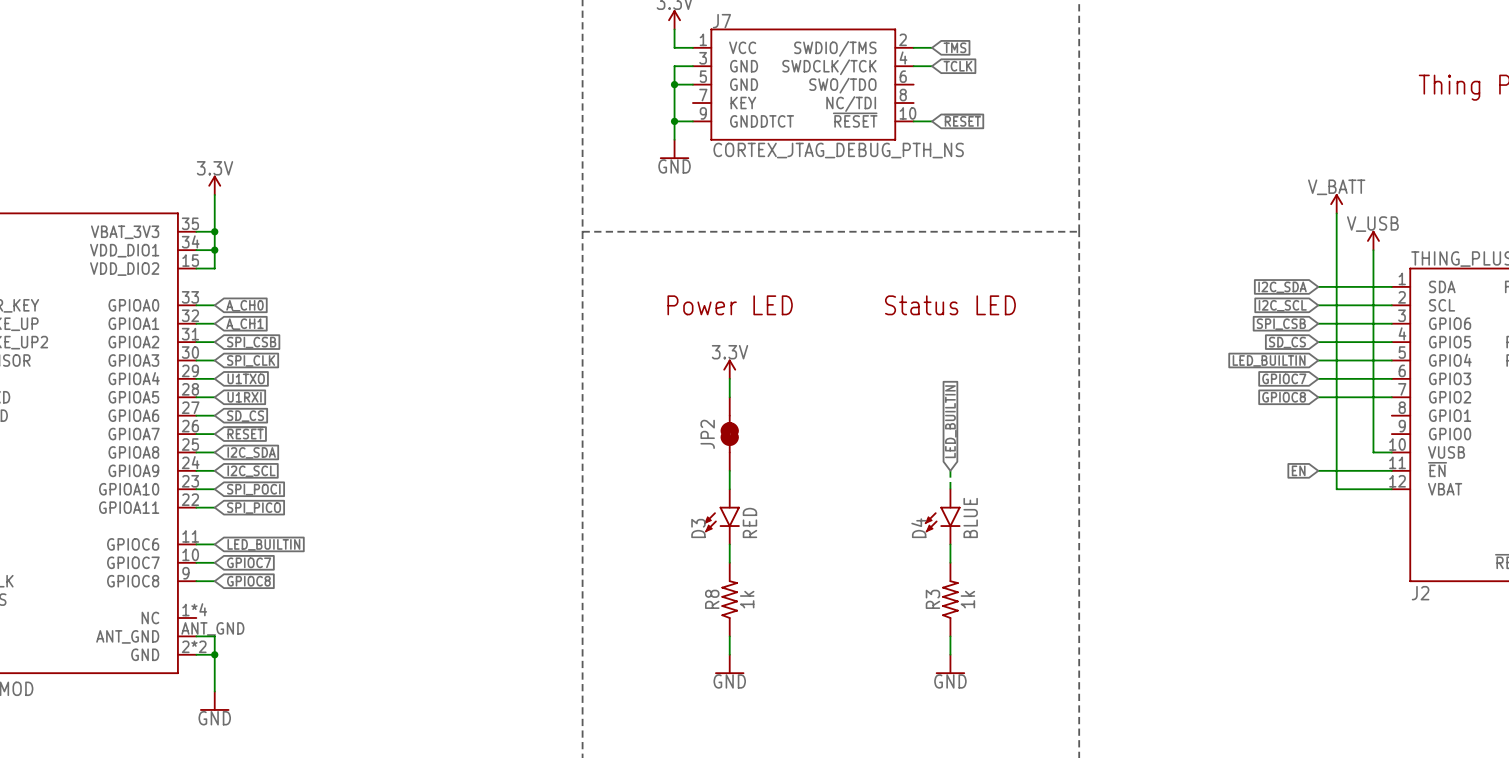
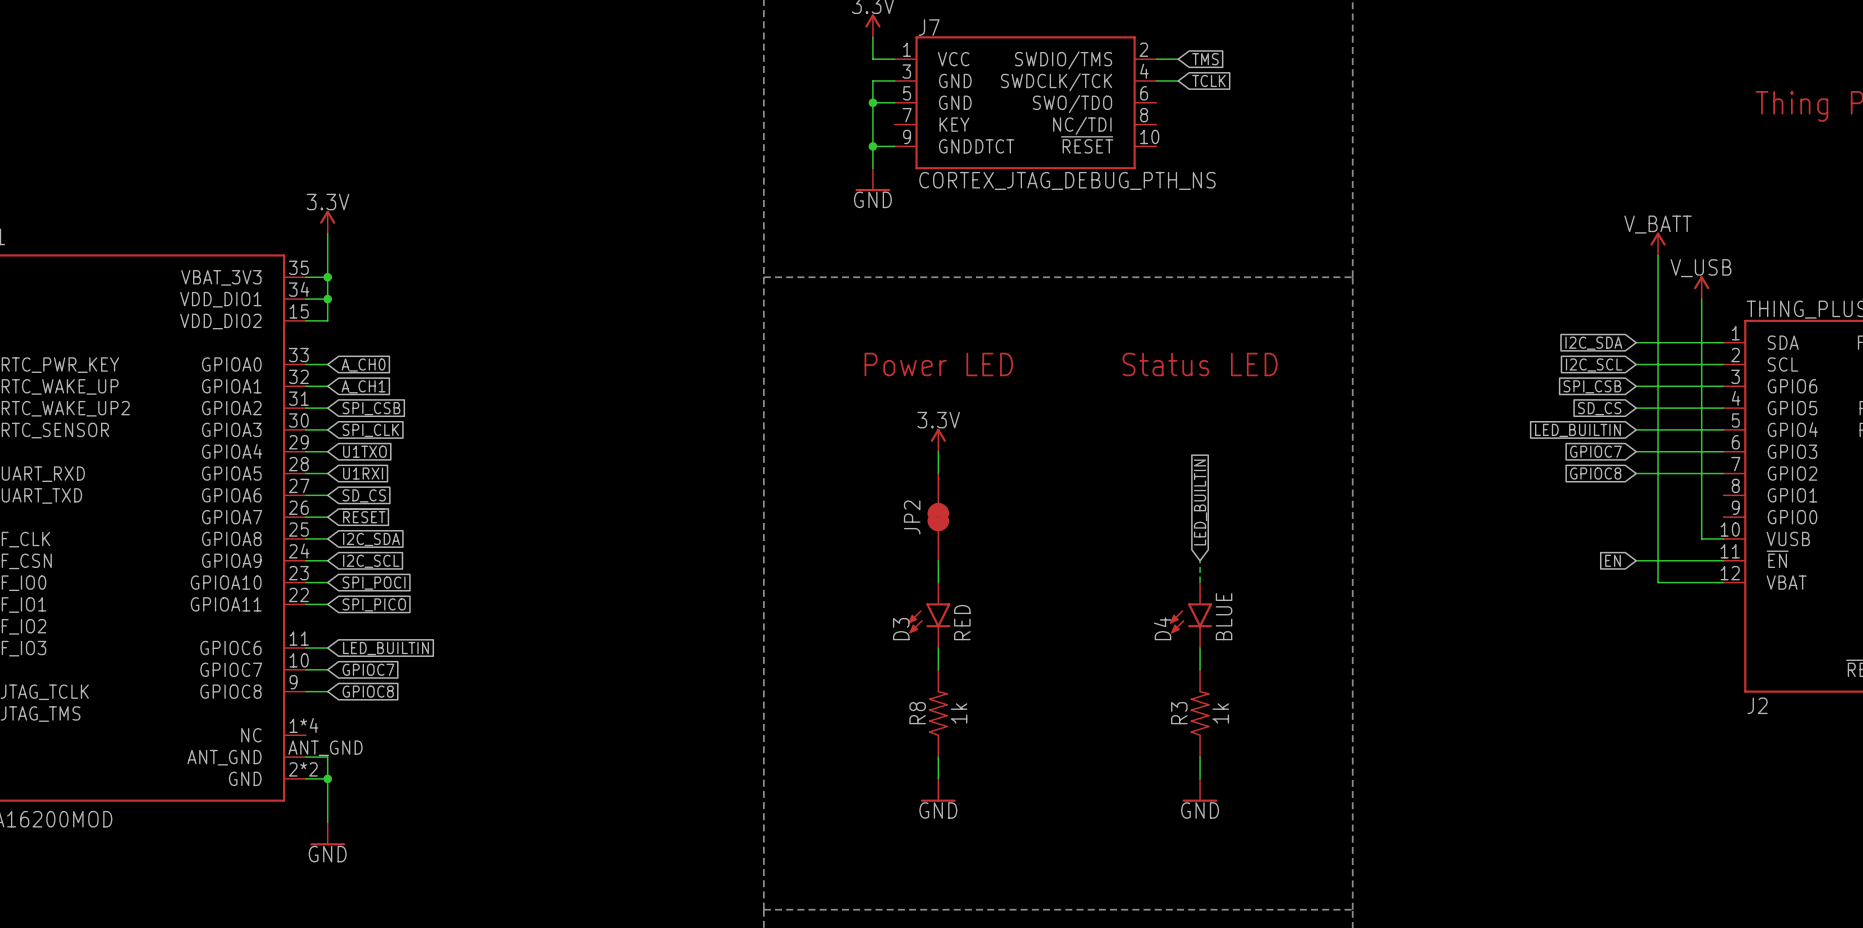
global label: ~{RESET} (962, 120) -> none
wire: (913, 121) (932, 121) -> none

